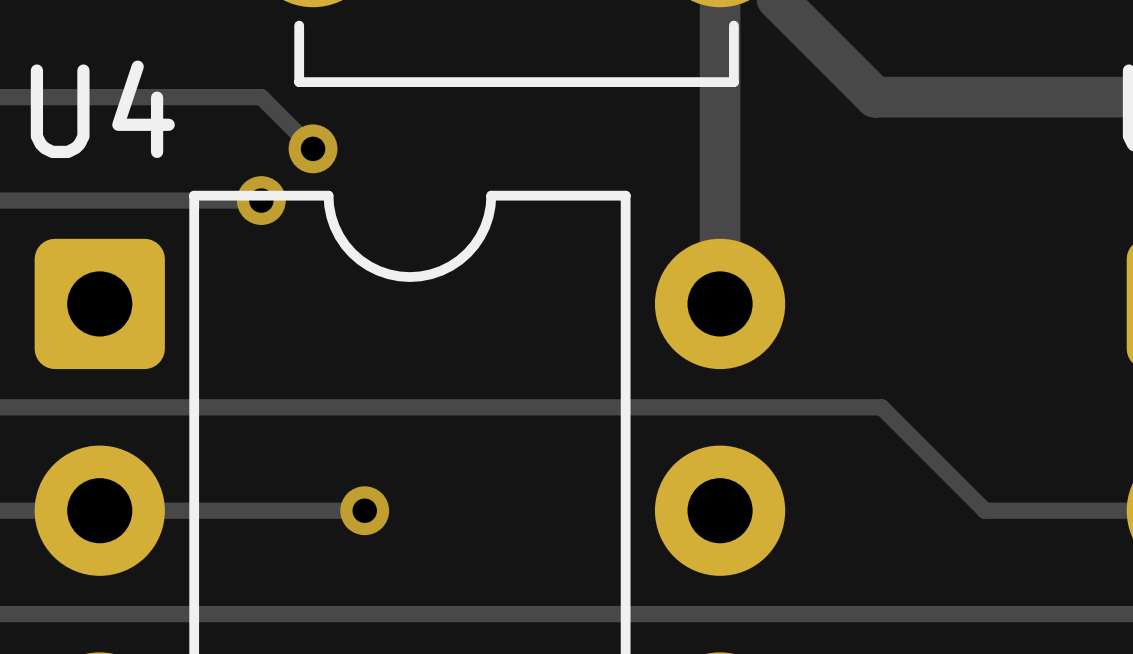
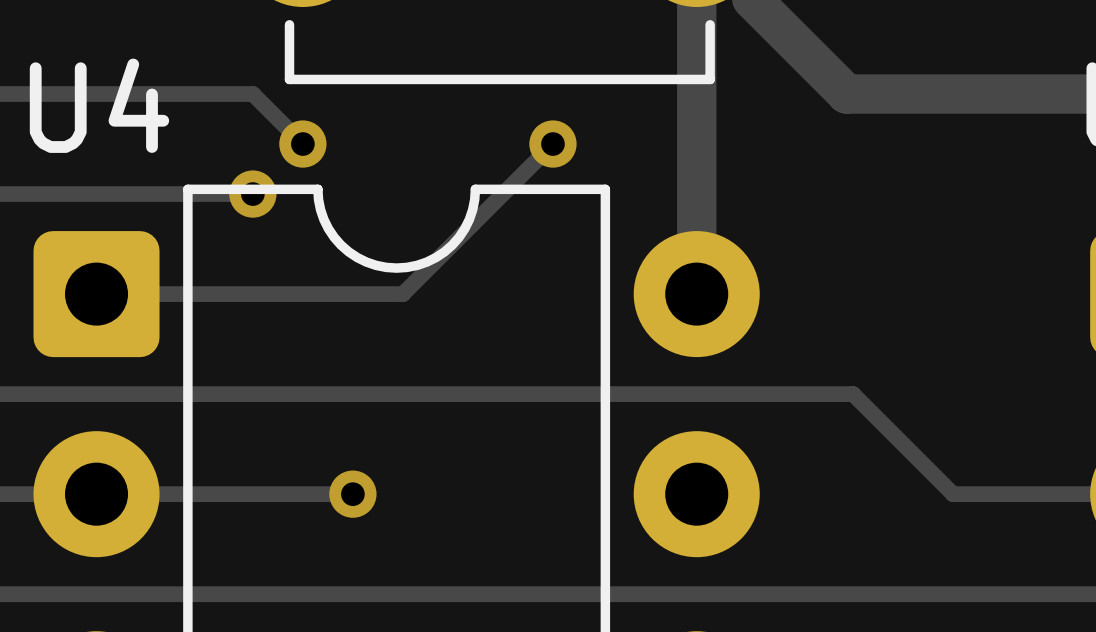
track: none -> (552, 144) (402, 294) (96, 294)
via: none -> (552, 144)

